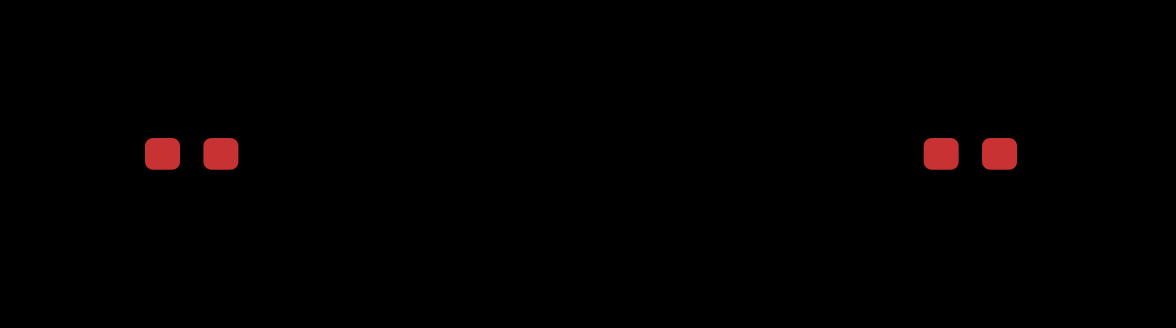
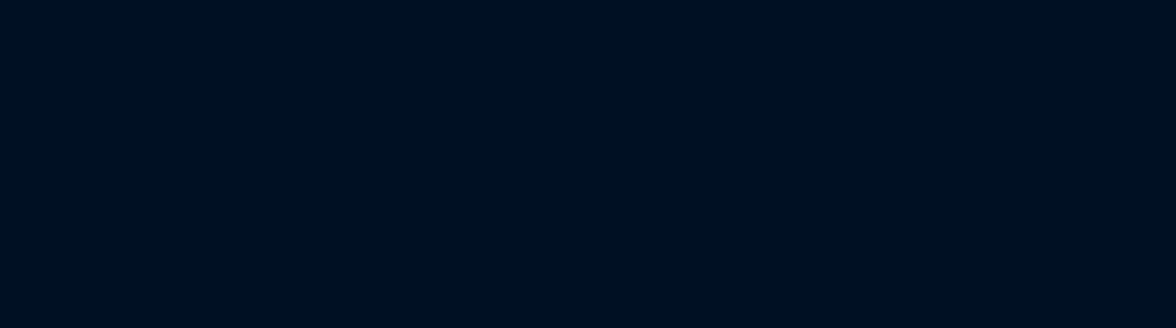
part: (191, 153) -> none
part: (970, 153) -> none

